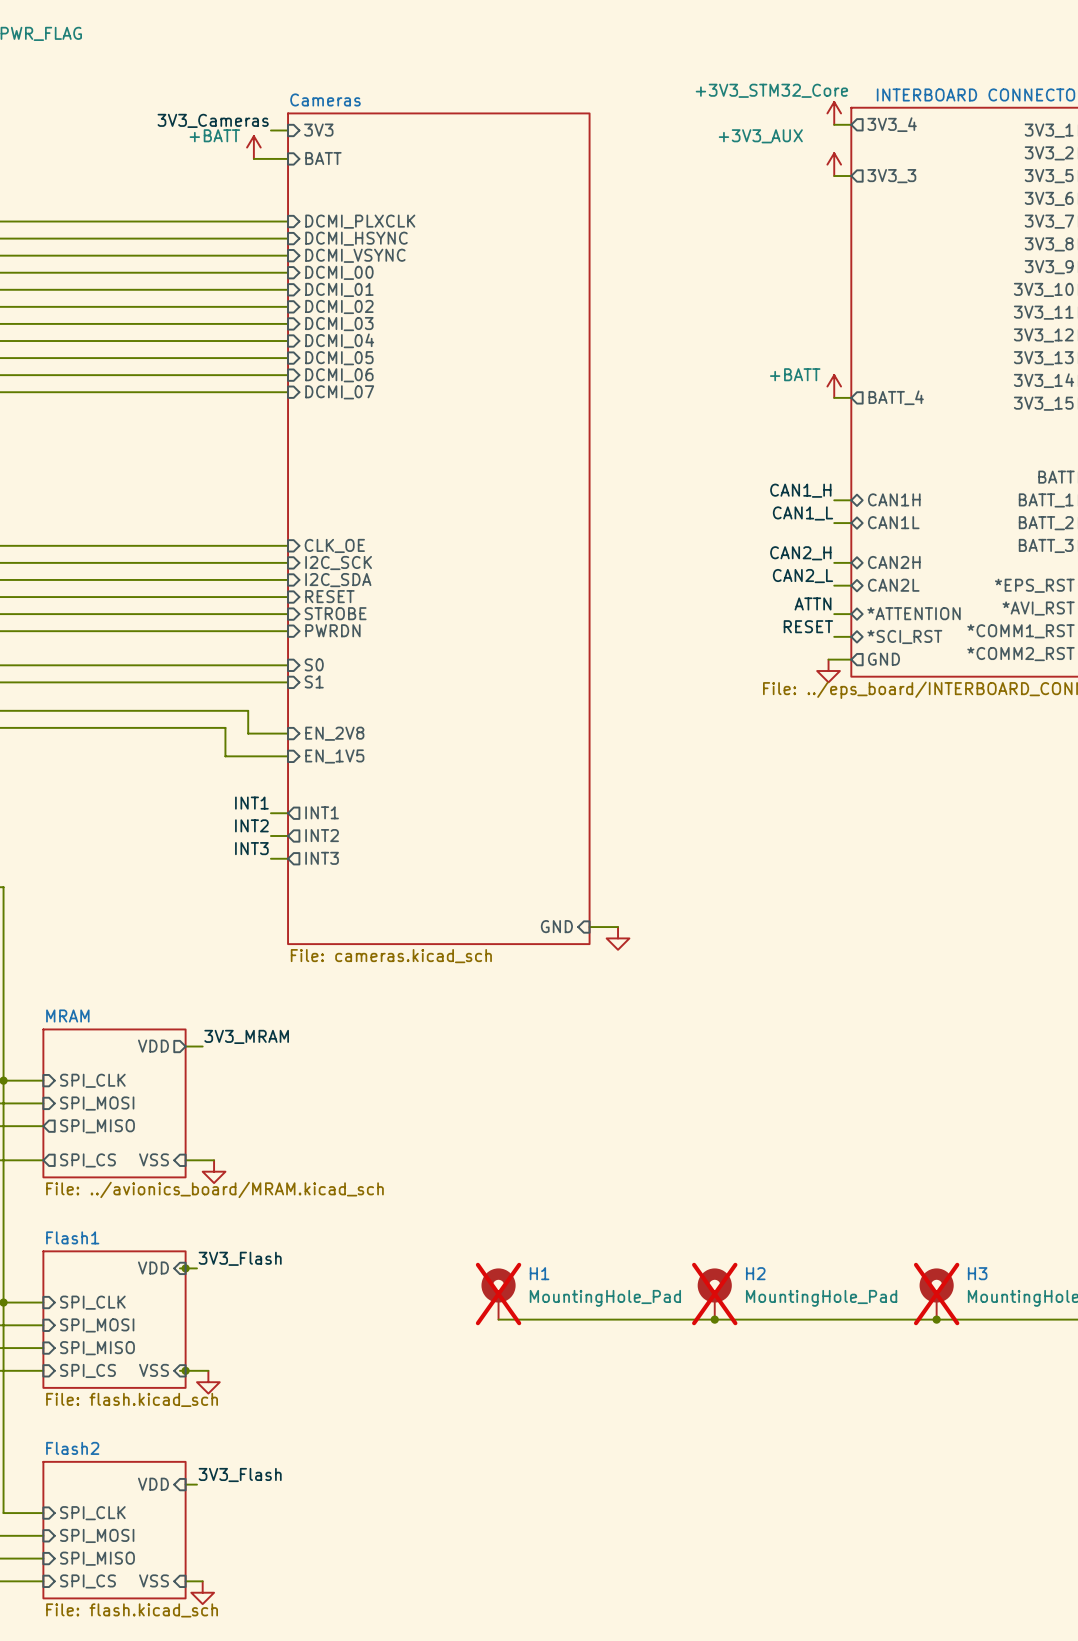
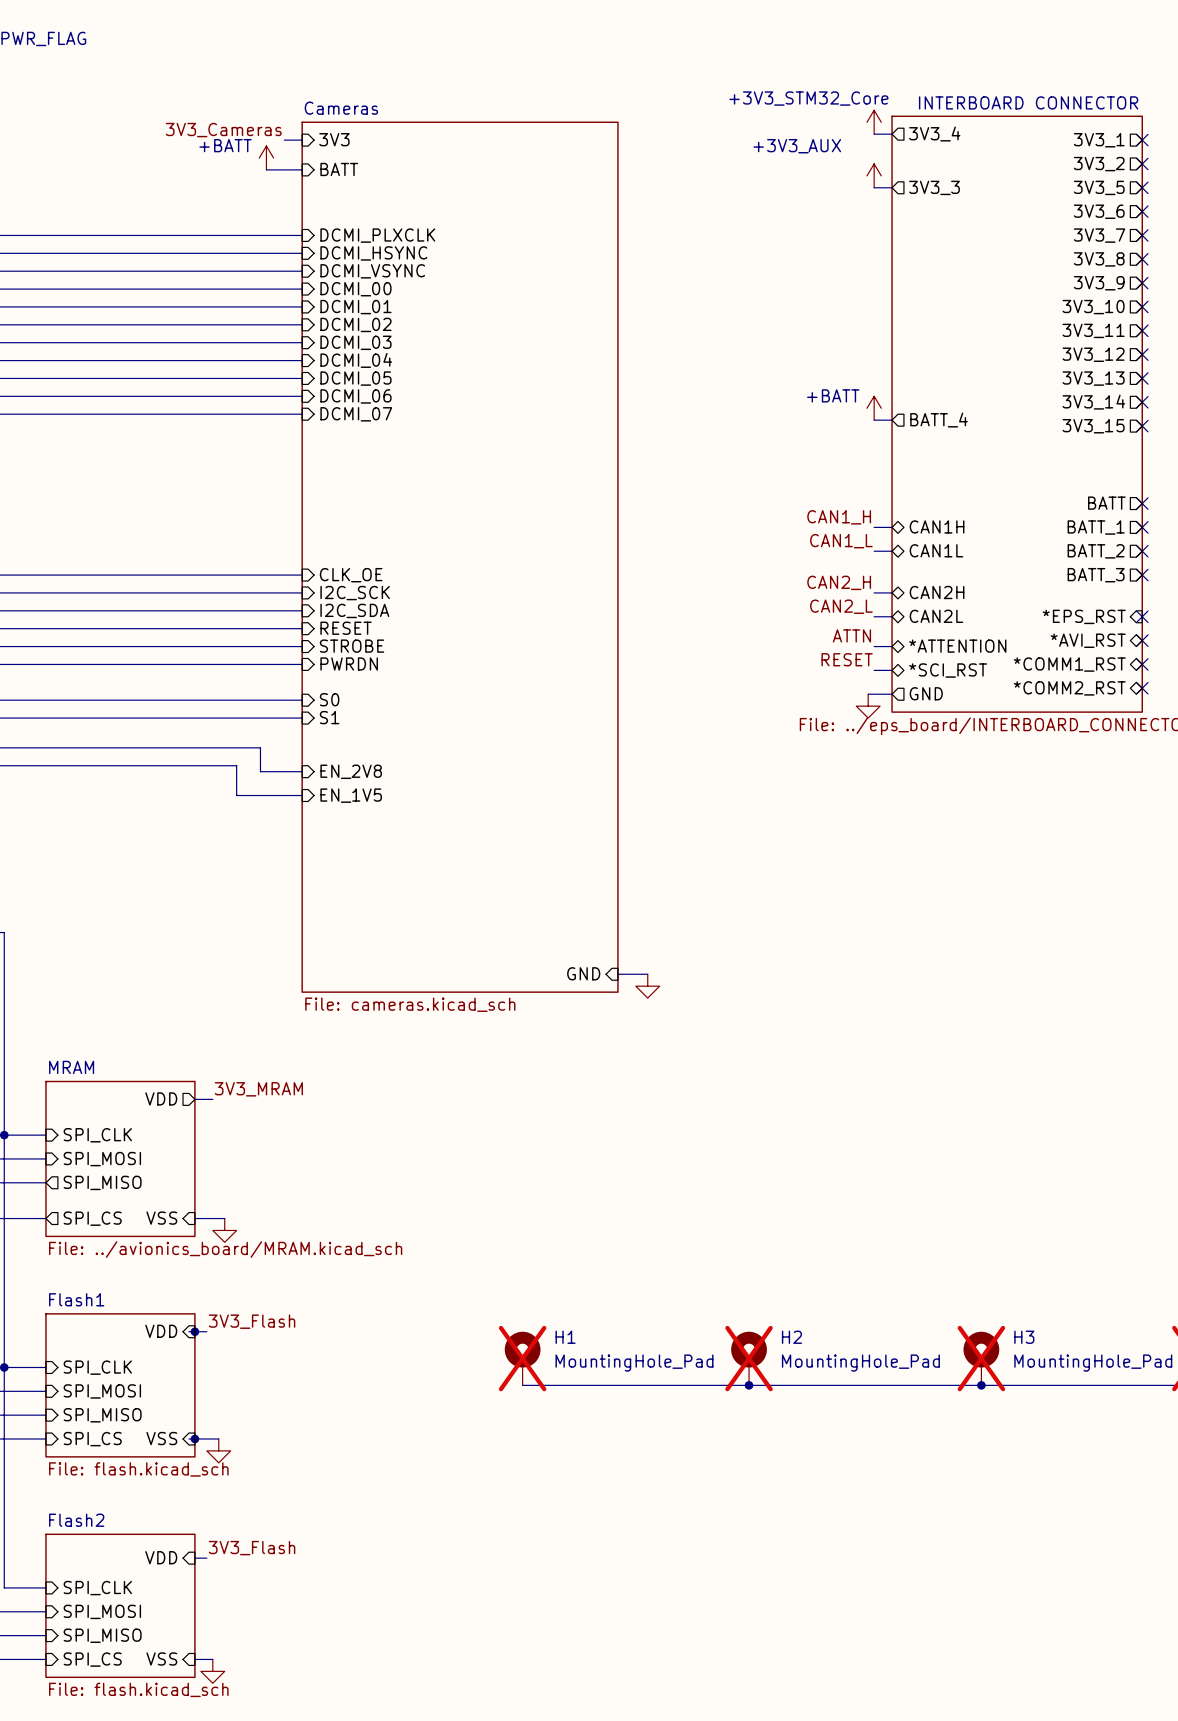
label: INT1 (251, 803) -> none
sheet pin: INT1 (322, 812) -> none
wire: (270, 813) (288, 813) -> none
label: INT2 (251, 825) -> none
sheet pin: INT2 (322, 835) -> none
wire: (270, 836) (288, 836) -> none
label: INT3 (251, 848) -> none
wire: (270, 858) (288, 858) -> none
sheet pin: INT3 (322, 858) -> none

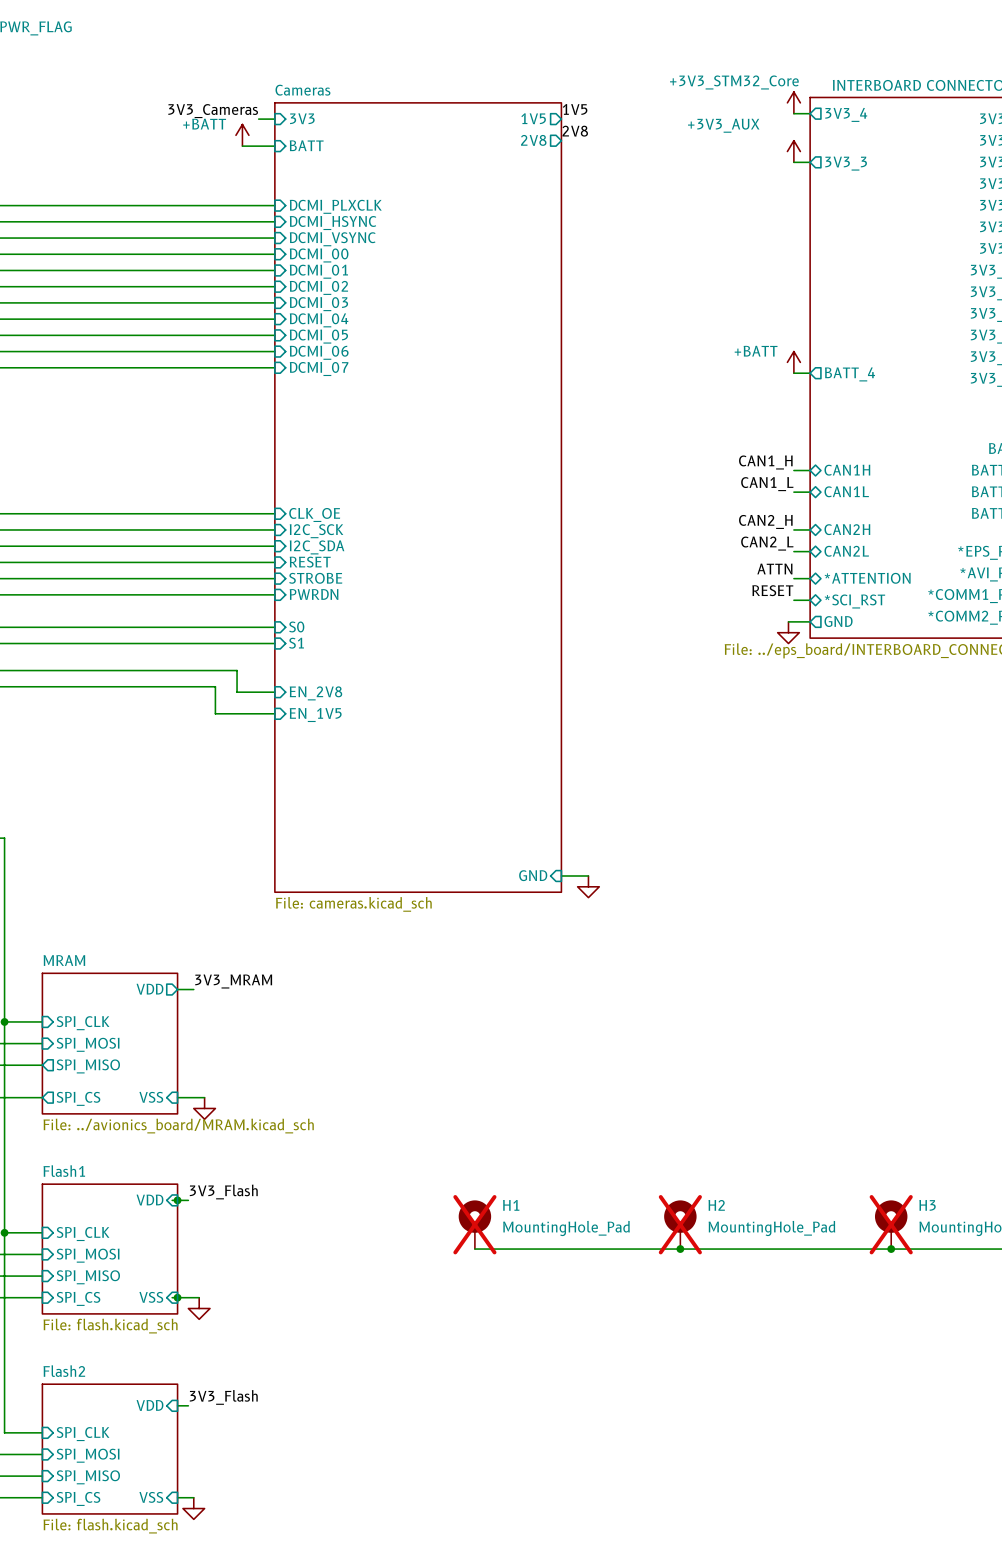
label: none -> 1V5 (575, 109)
sheet pin: none -> 1V5 (533, 118)
label: none -> 2V8 (575, 131)
sheet pin: none -> 2V8 (533, 140)

